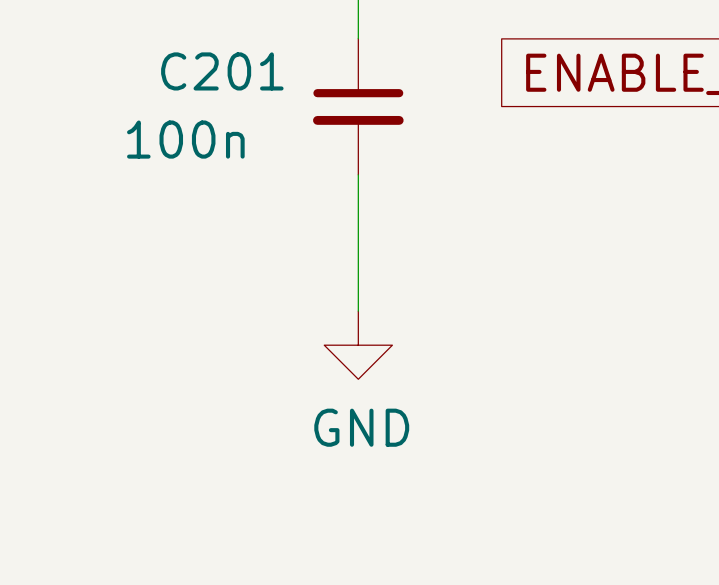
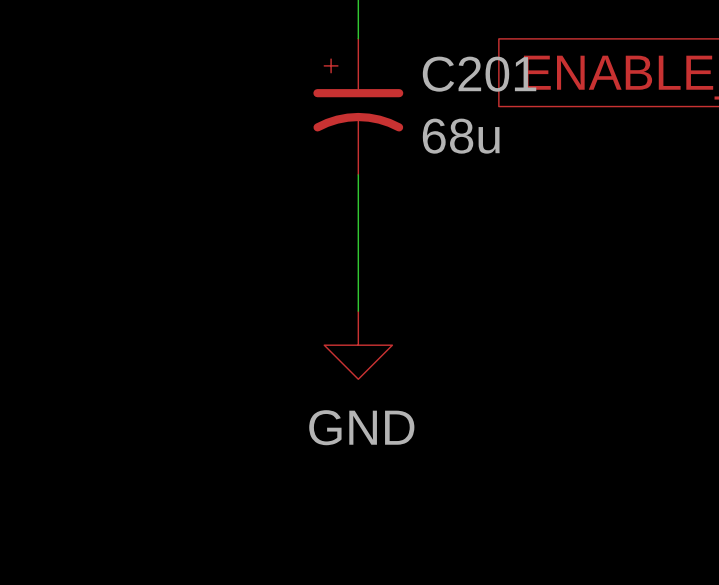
C201 symbol: [313, 38, 404, 175] -> [313, 38, 404, 175]
C201 name position: C201 (222, 71) -> C201 (479, 74)
C201 value: 100n (185, 139) -> 68u (461, 136)

